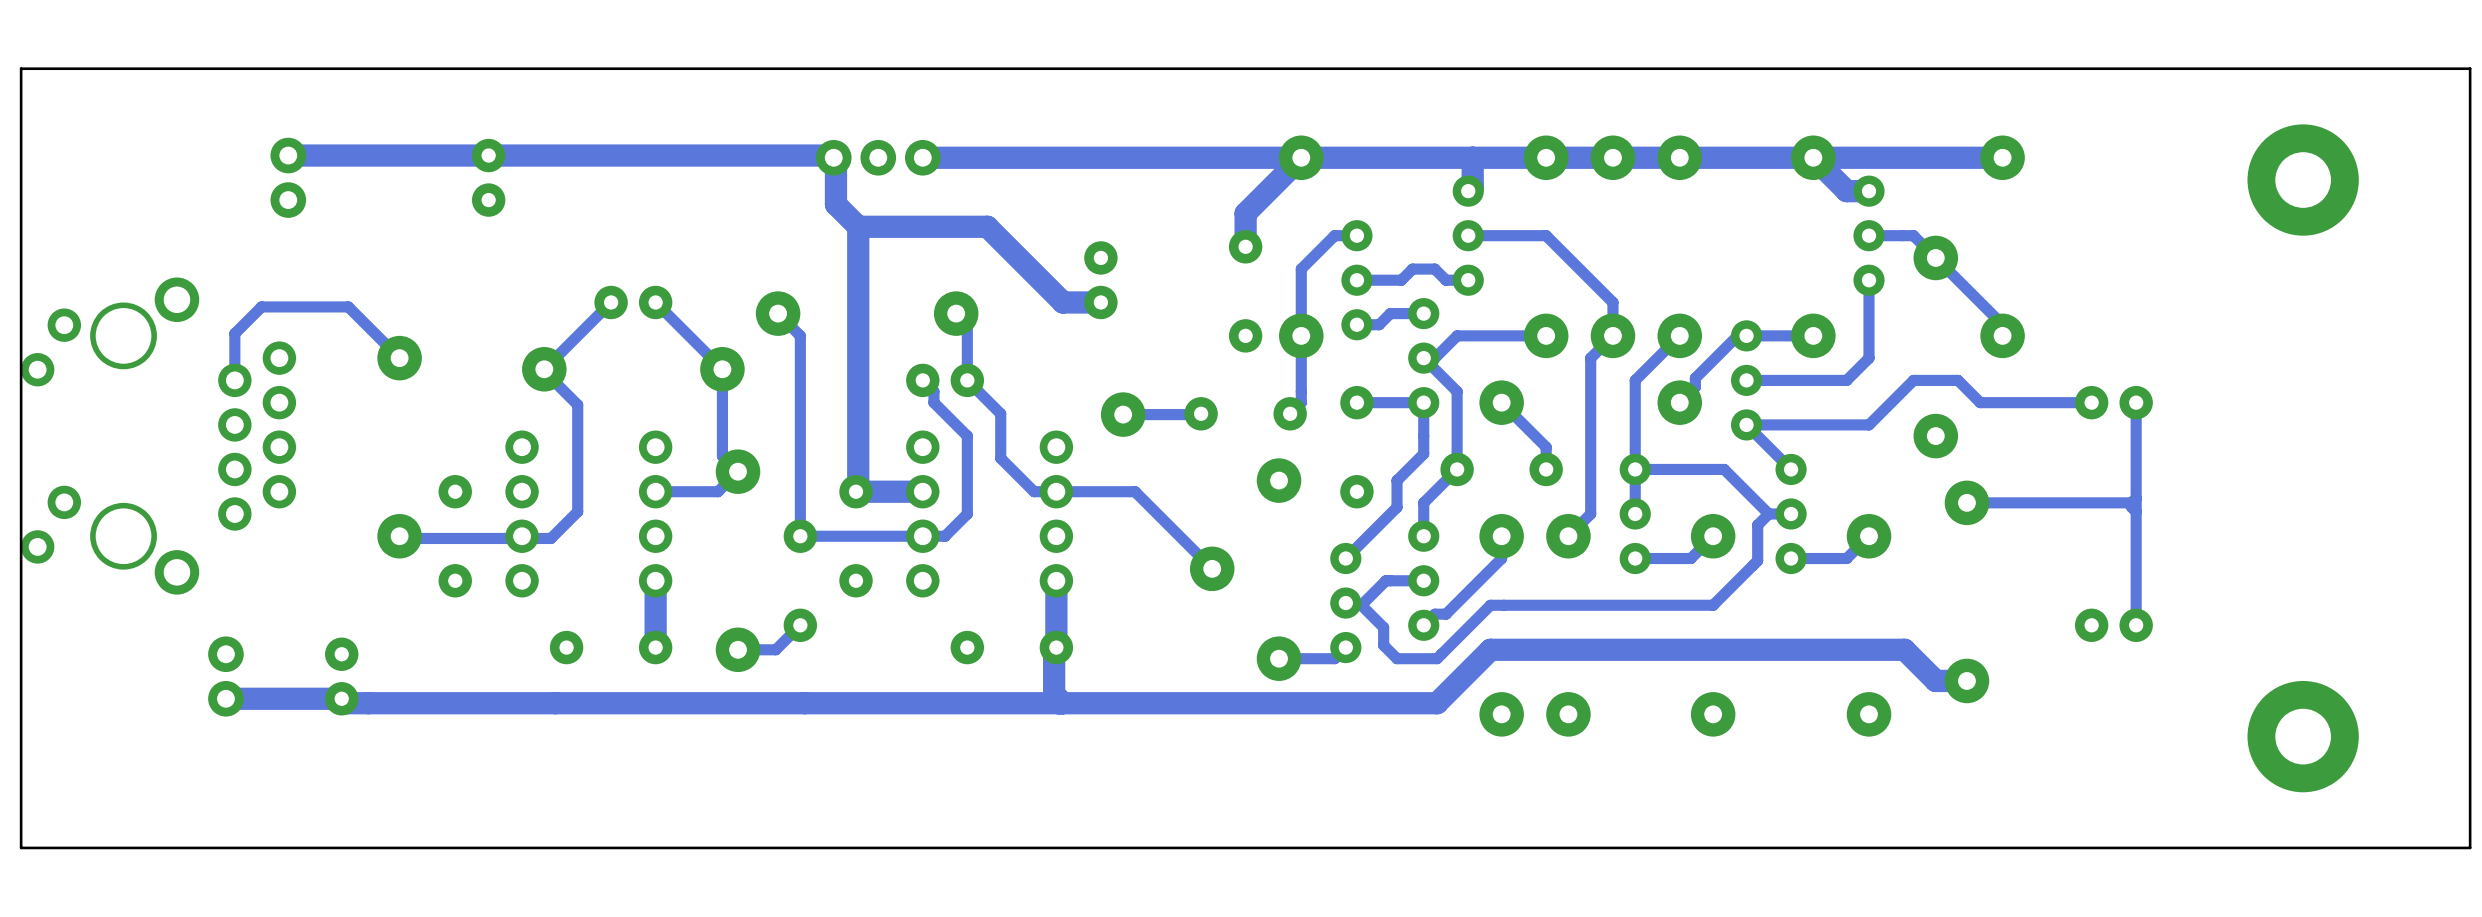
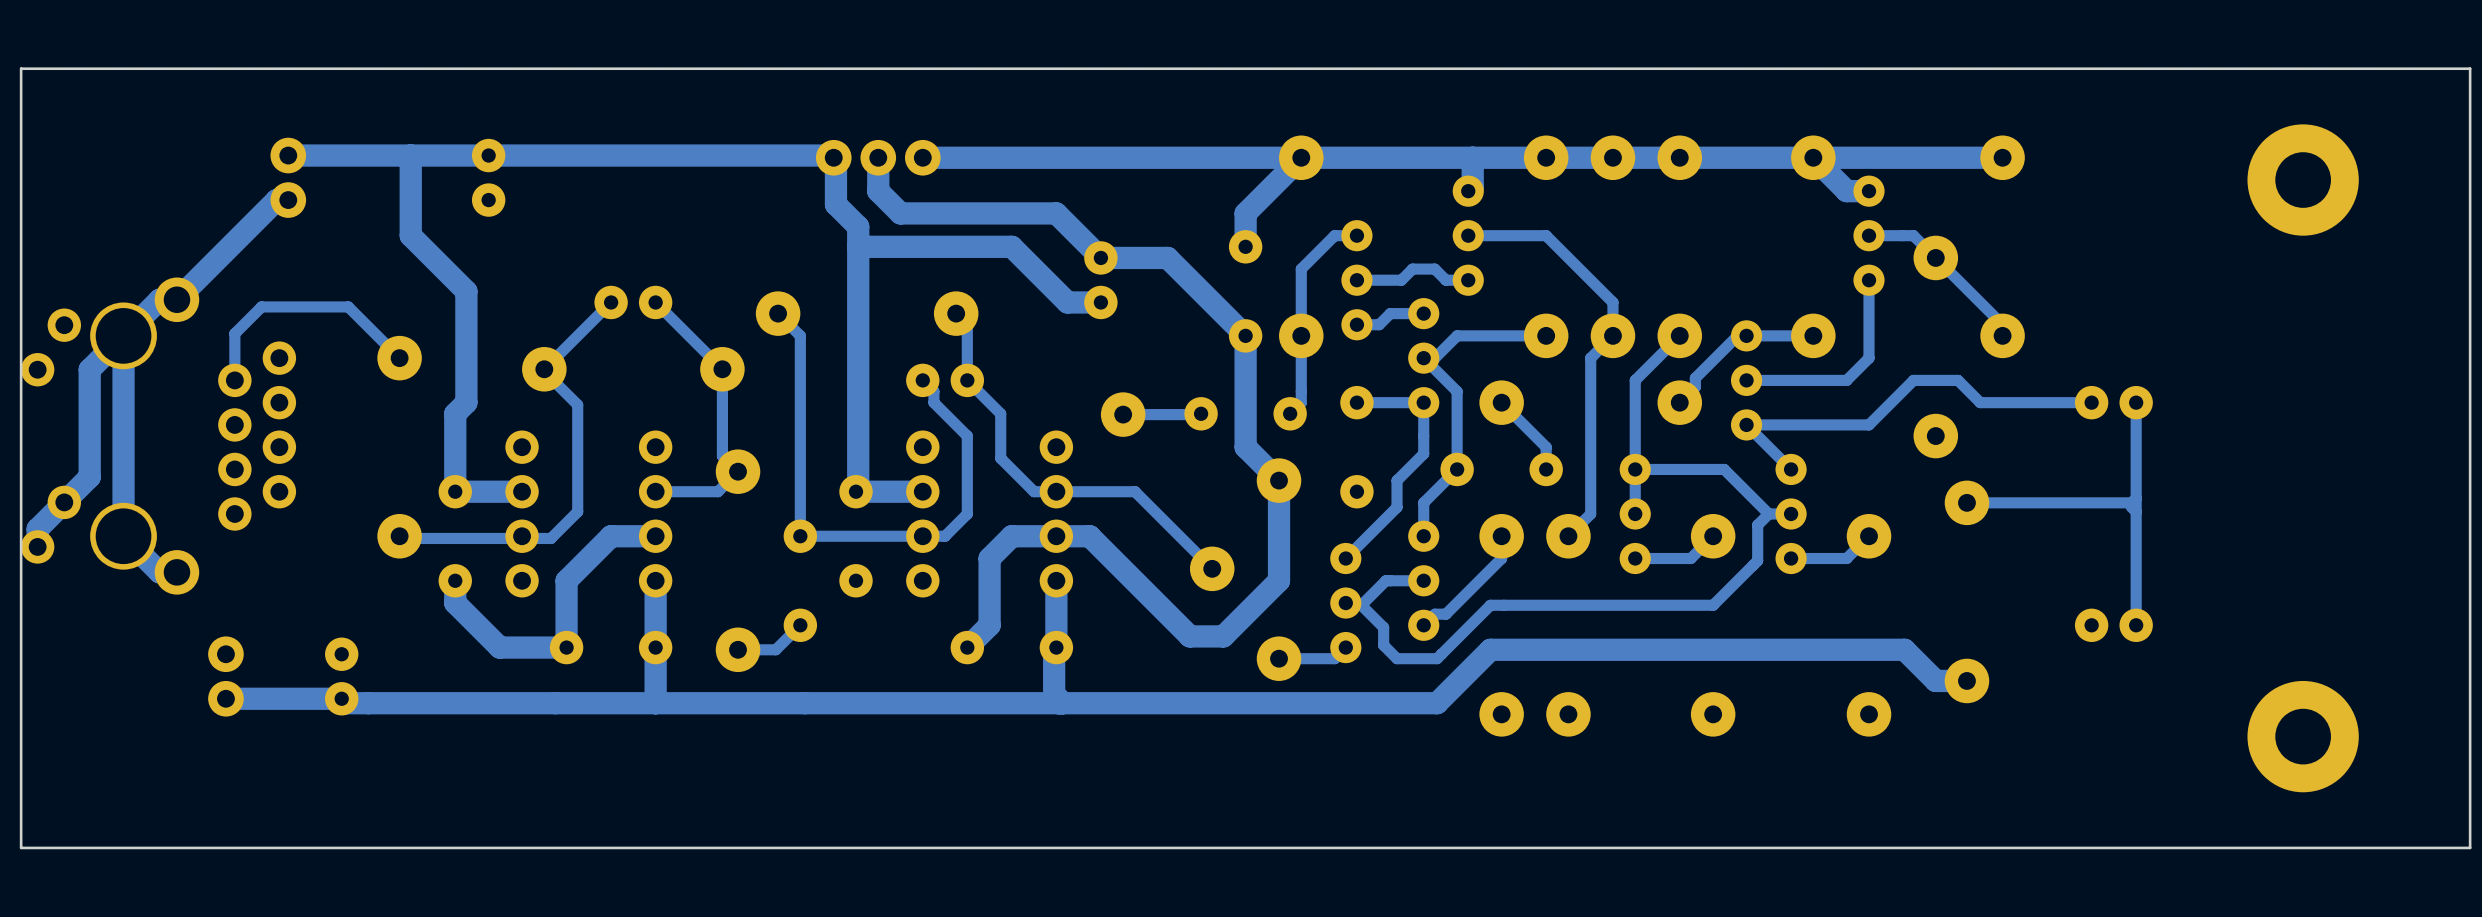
bottom track: none -> (410, 155) (410, 235) (466, 291) (466, 402) (455, 413) (455, 491) (522, 491)
bottom track: none -> (878, 157) (878, 191) (900, 213) (1056, 213) (1100, 257) (1167, 257) (1245, 335) (1245, 447) (1279, 480) (1279, 580) (1223, 636) (1189, 636) (1089, 536) (1011, 536) (989, 558) (989, 625) (967, 647)
bottom track: none -> (288, 200) (276, 200) (176, 299) (159, 299) (89, 369) (89, 477) (37, 529) (37, 546)
bottom track: (858, 226) (987, 226) (1063, 302) (1067, 302) -> (858, 246) (1011, 246) (1067, 302)
bottom track: none -> (123, 335) (123, 536) (159, 572) (176, 572)
bottom track: none -> (655, 536) (611, 536) (566, 580) (566, 647) (499, 647) (455, 603) (455, 580)
bottom track: none -> (655, 647) (655, 703)

